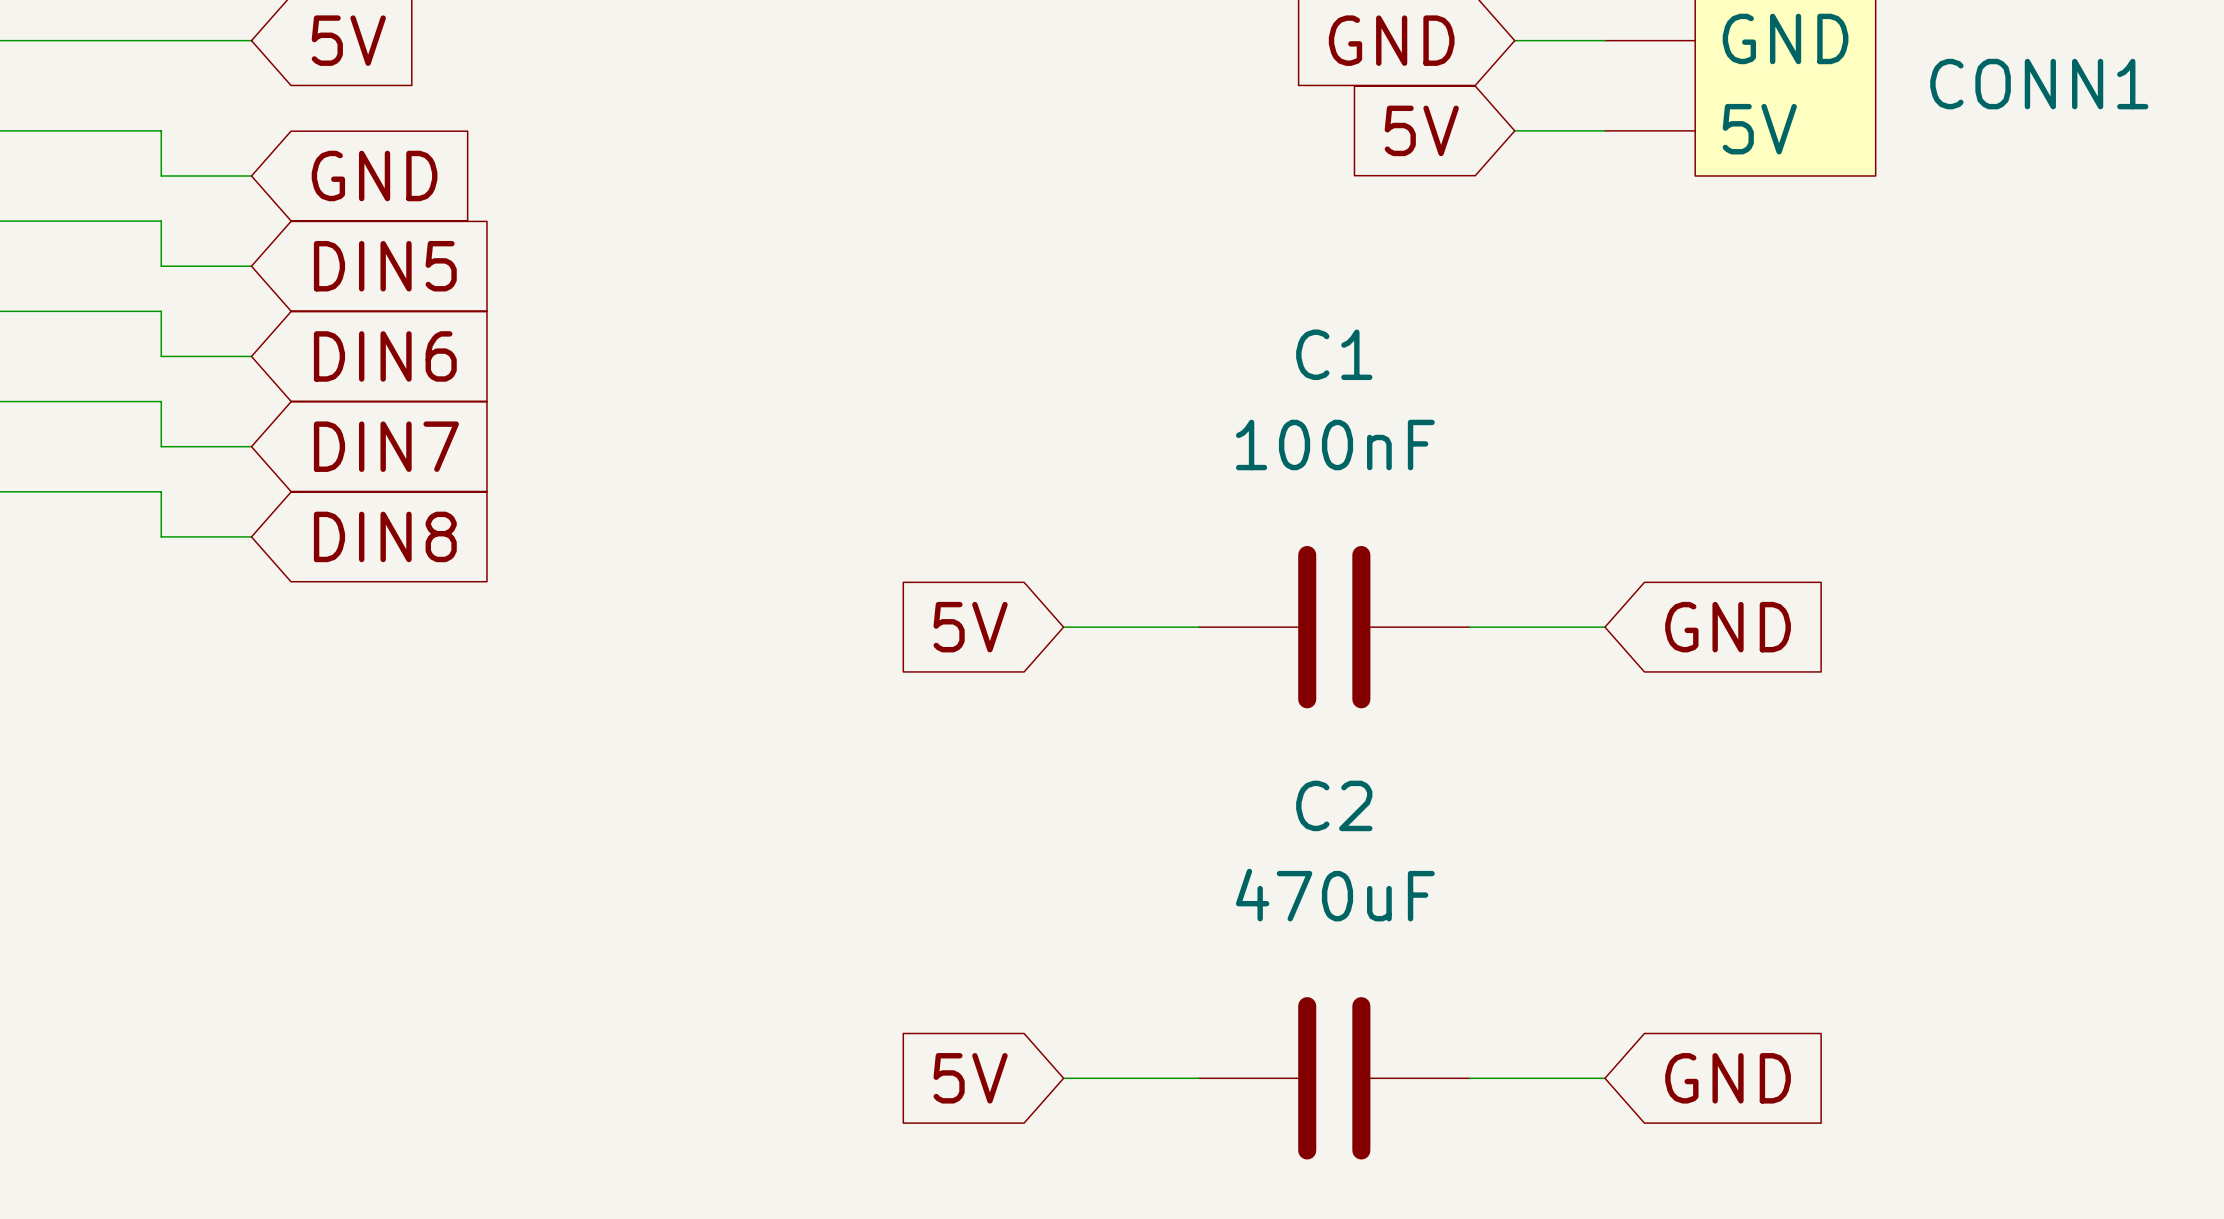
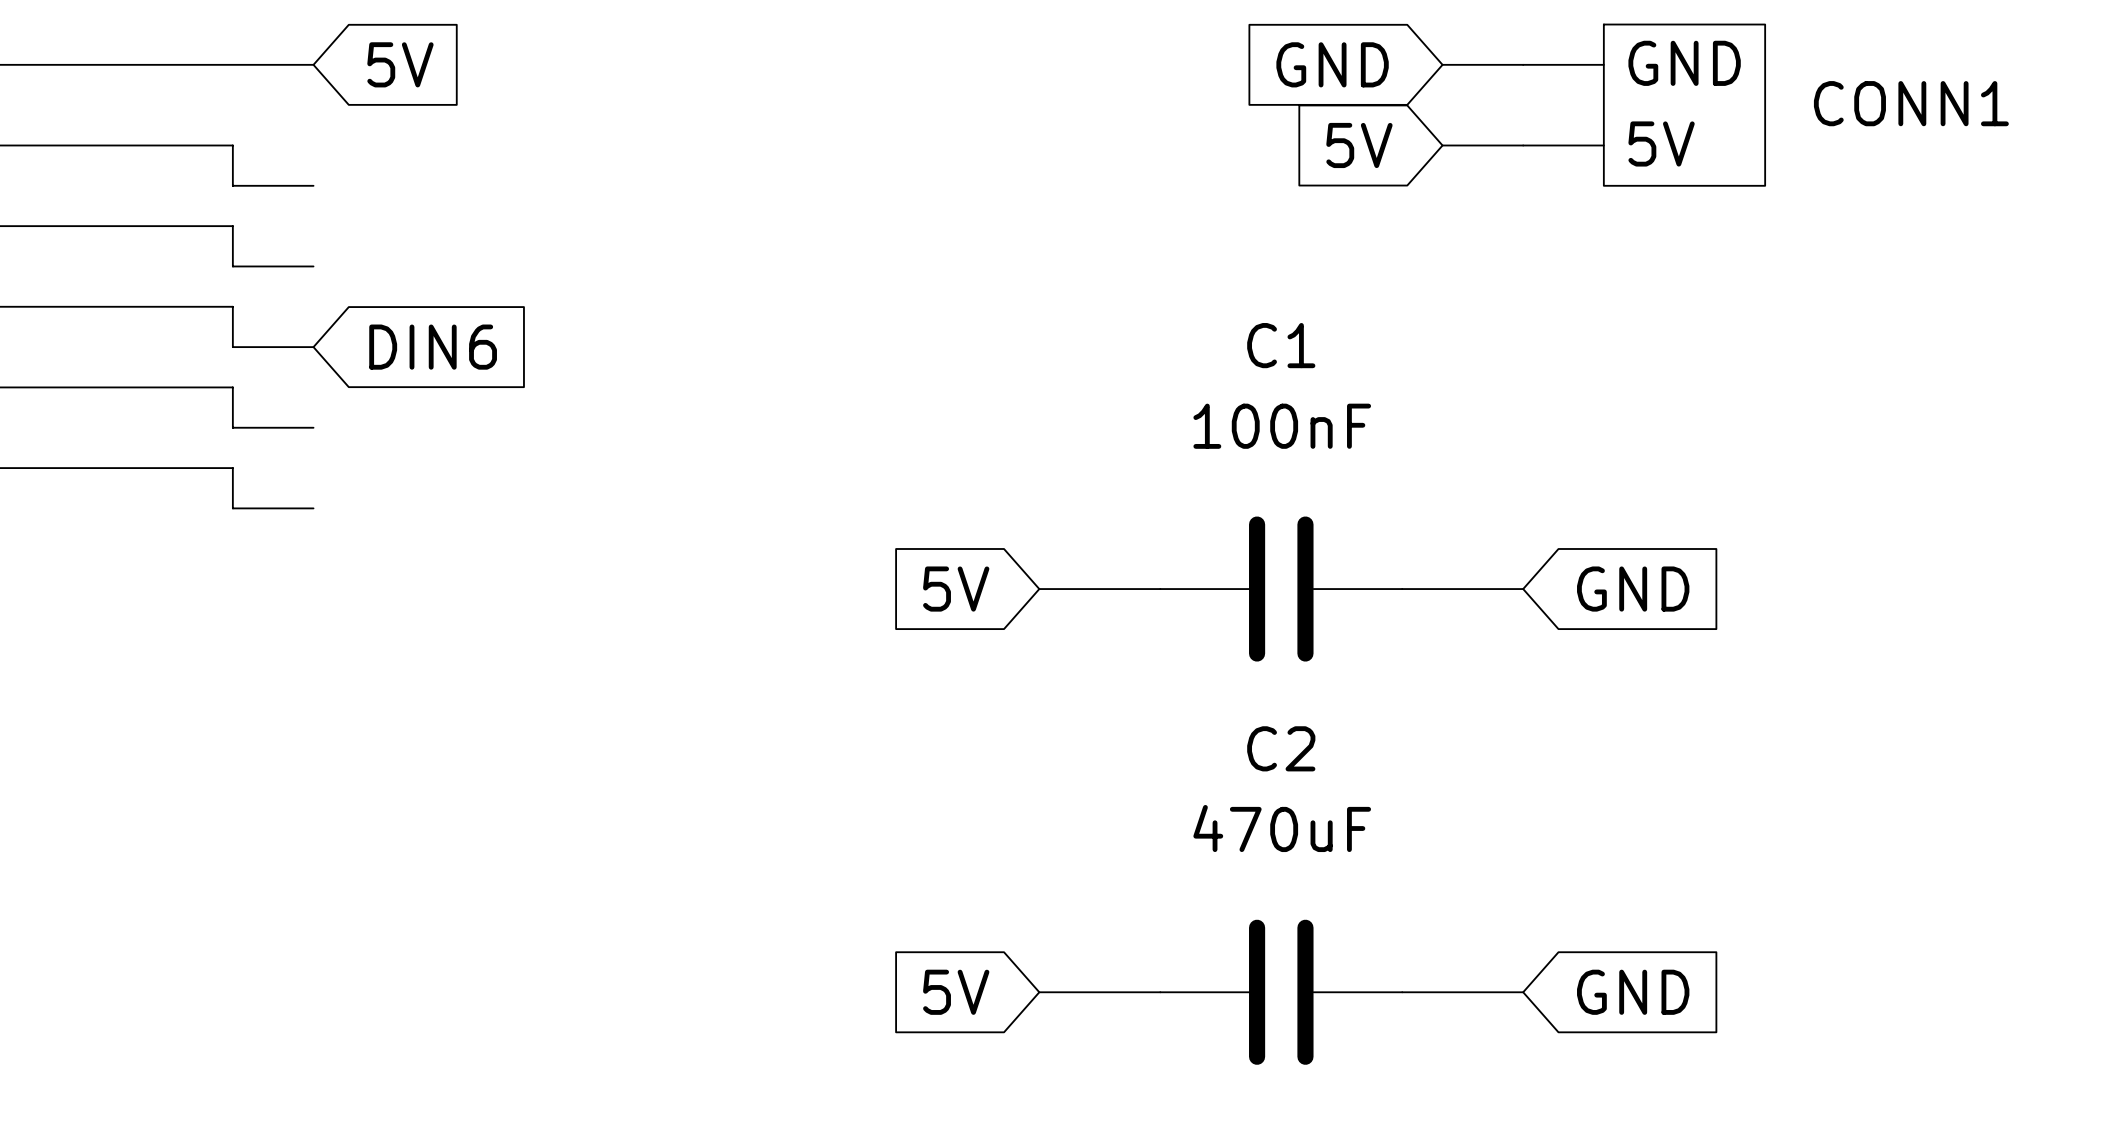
global label: GND (374, 175) -> none
global label: DIN5 (385, 266) -> none
global label: DIN7 (386, 446) -> none
global label: DIN8 (385, 536) -> none

